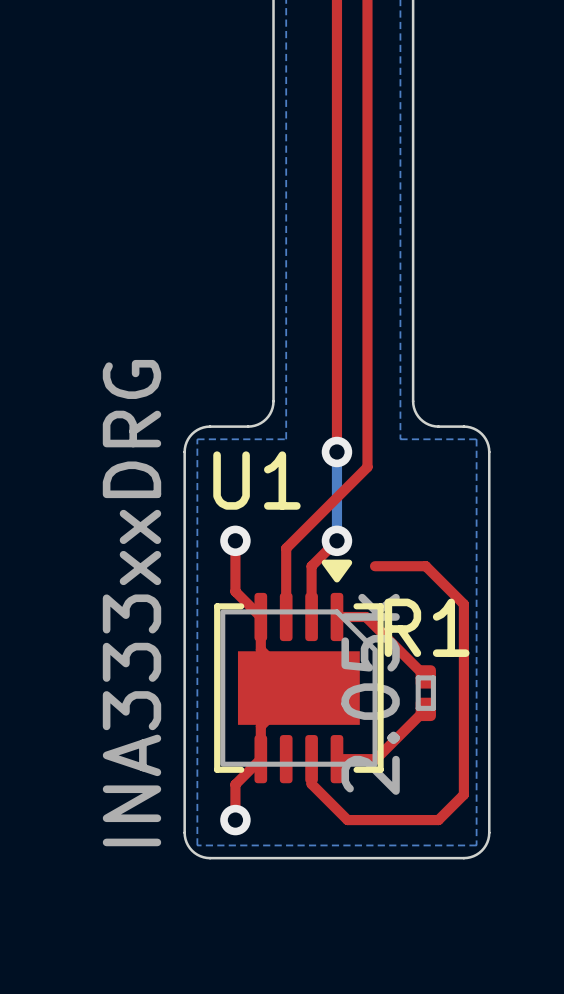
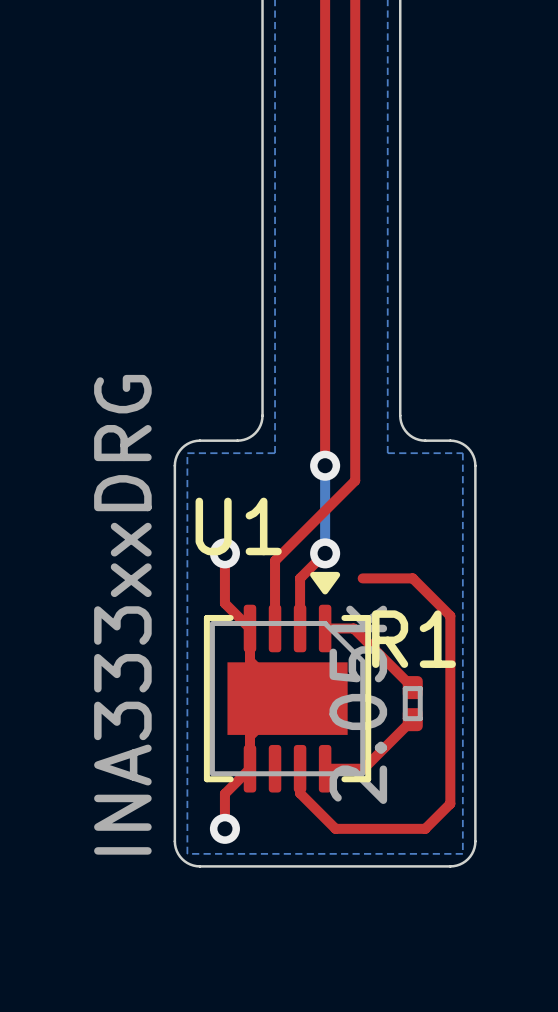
U1 name position: U1 (256, 480) -> U1 (238, 526)

